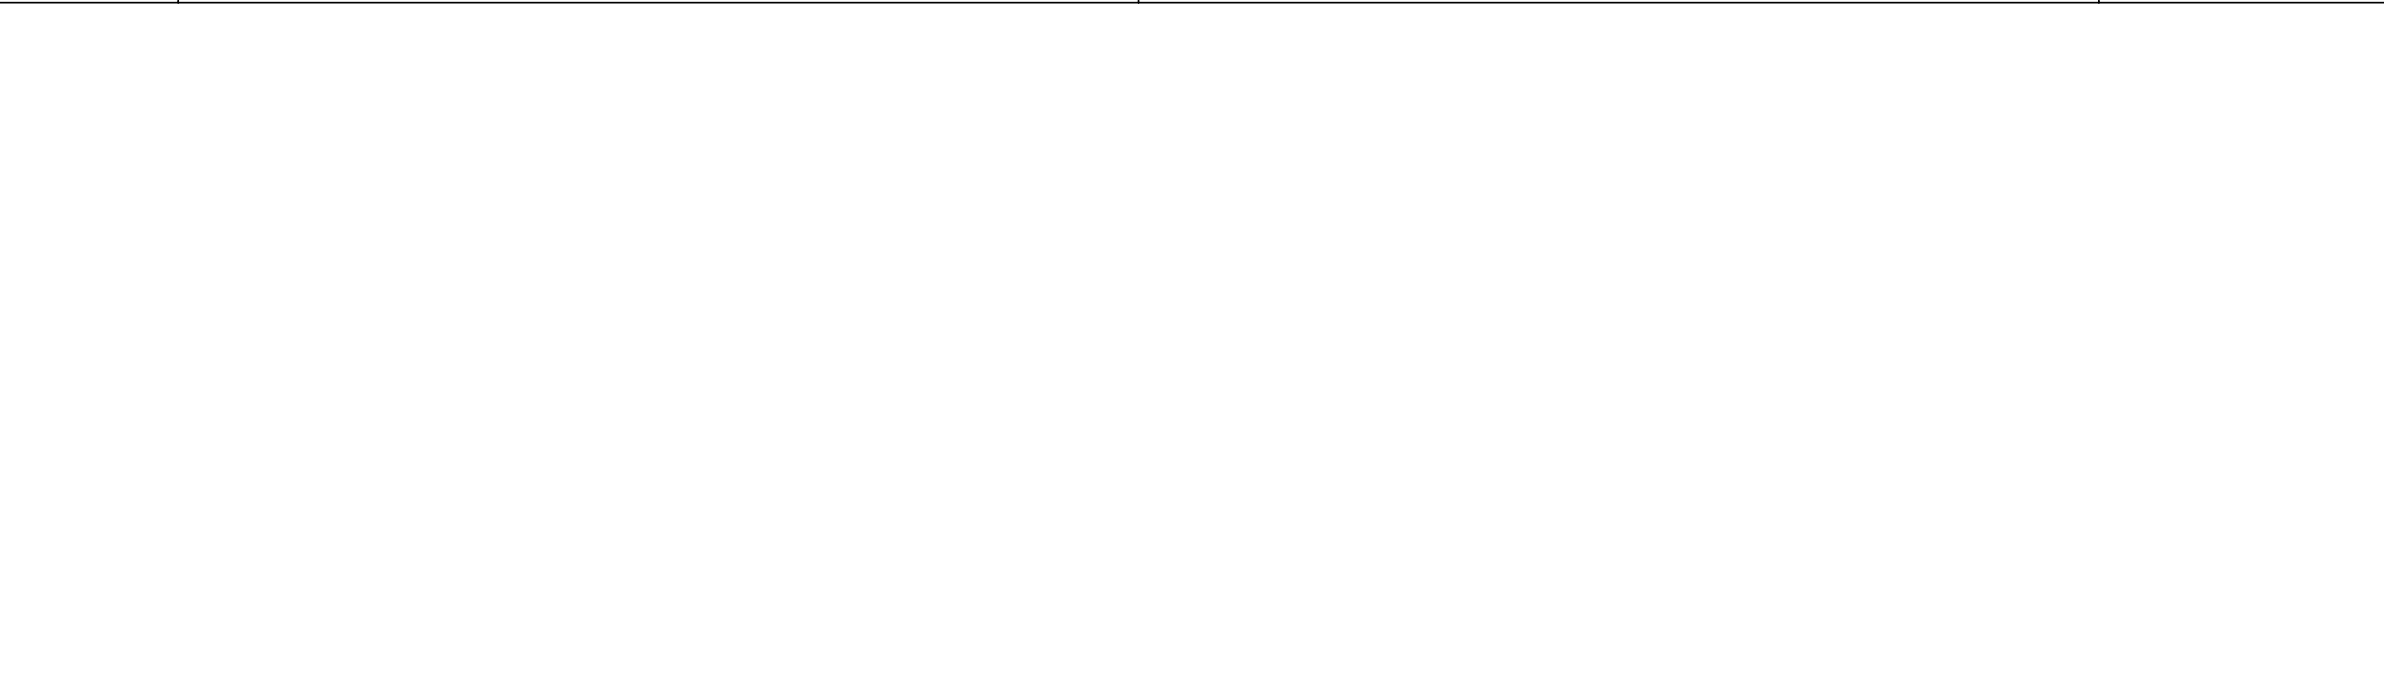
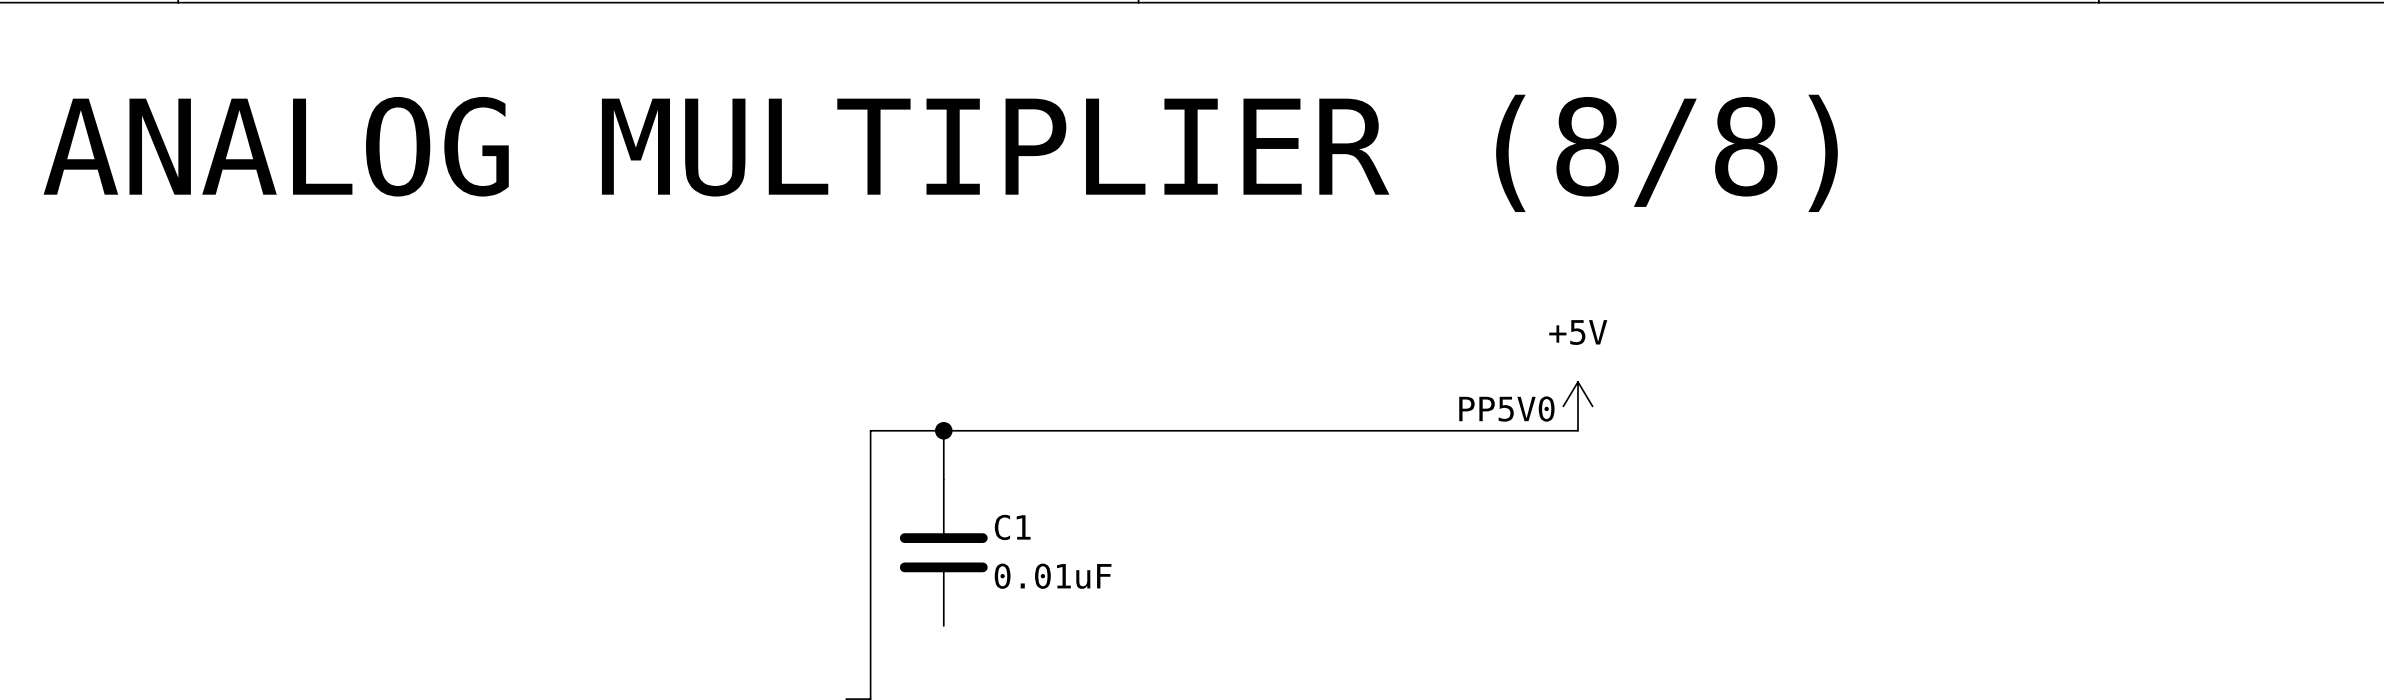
text: none -> ANALOG MULTIPLIER (8/8) (940, 153)
power symbol: none -> +5V (1577, 406)
label: none -> PP5V0 (1506, 409)
wire: none -> (943, 430) (943, 479)
junction: none -> (943, 430)
wire: none -> (1577, 430) (870, 430) (870, 699) (846, 699)
C1: none -> 0.01uF (943, 552)

